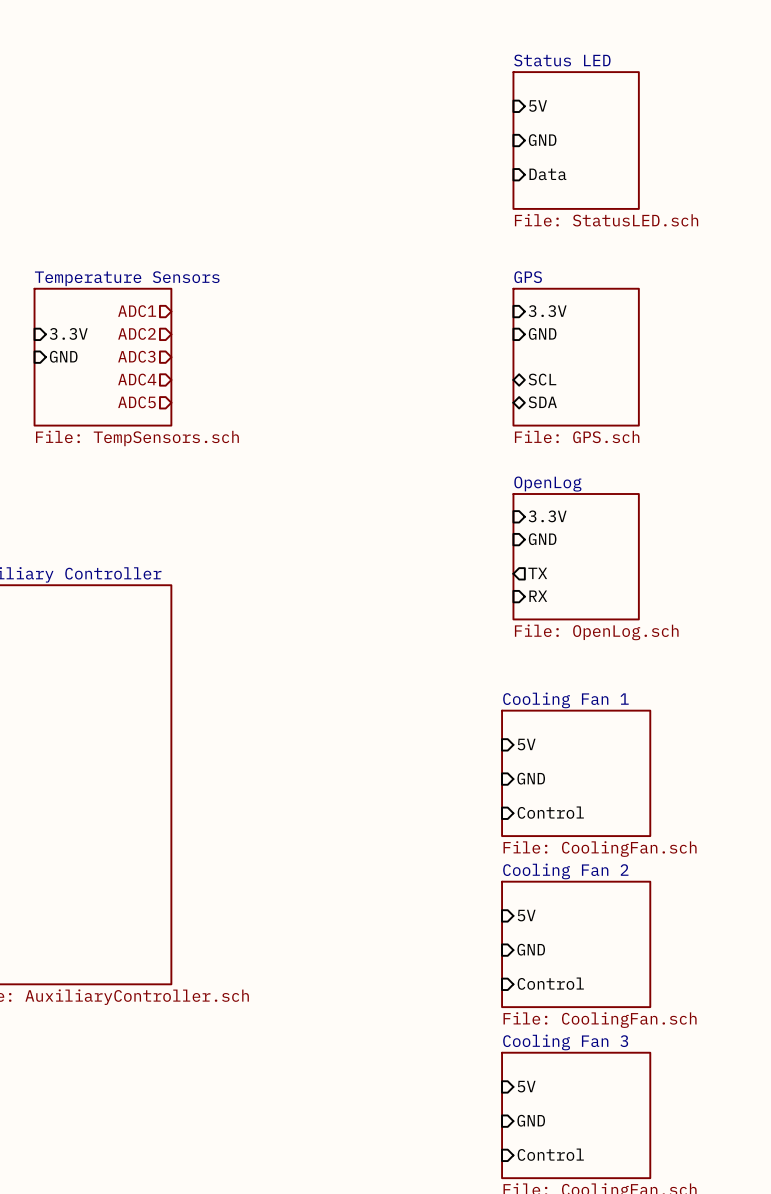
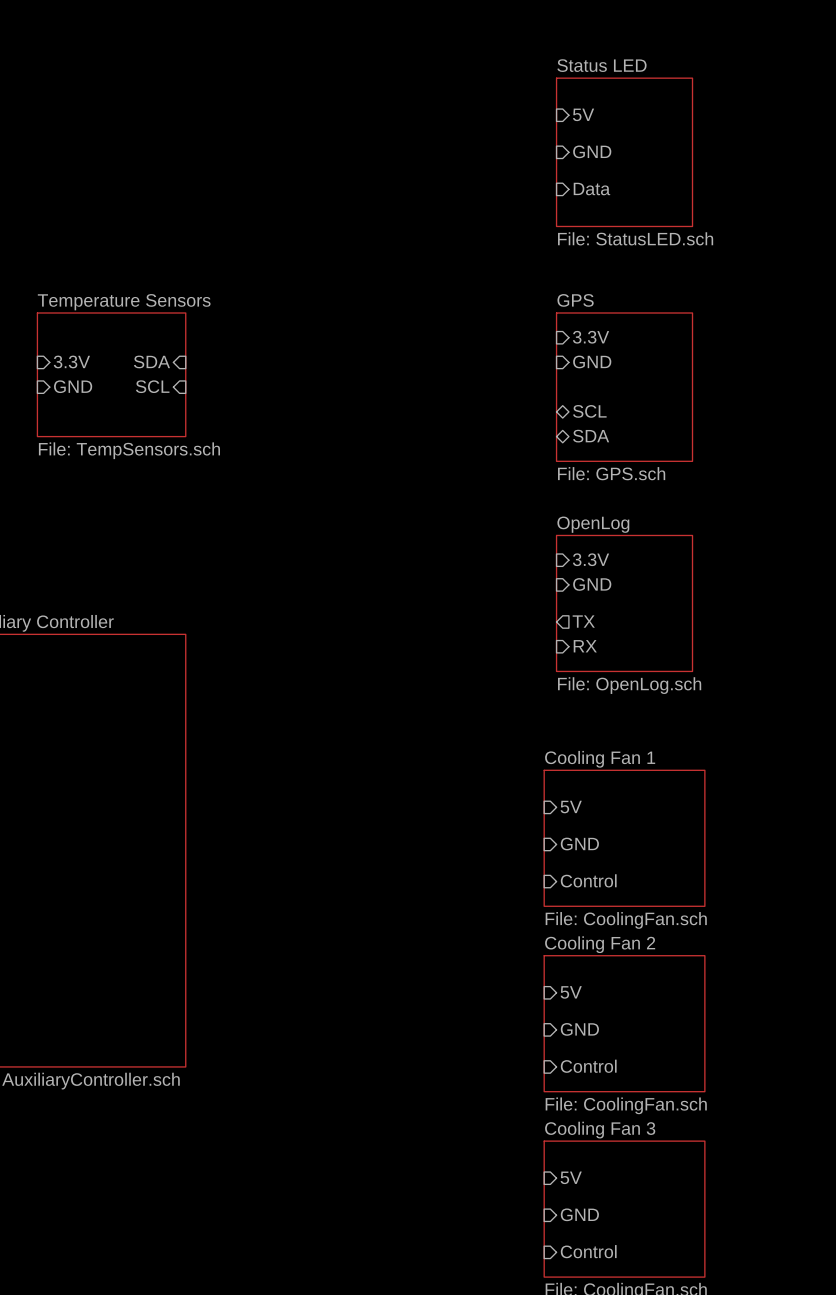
hierarchical label: ADC1 (137, 311) -> none
hierarchical label: ADC2 (137, 333) -> none
sheet pin: none -> SDA (151, 361)
sheet Temperature Sensors: none -> File: TempSensors.sch (111, 374)
hierarchical label: ADC3 (136, 356) -> none
sheet pin: none -> SCL (152, 386)
sheet Temperature Sensors: File: TempSensors.sch (102, 357) -> none
hierarchical label: ADC4 (137, 379) -> none
hierarchical label: ADC5 (136, 402) -> none

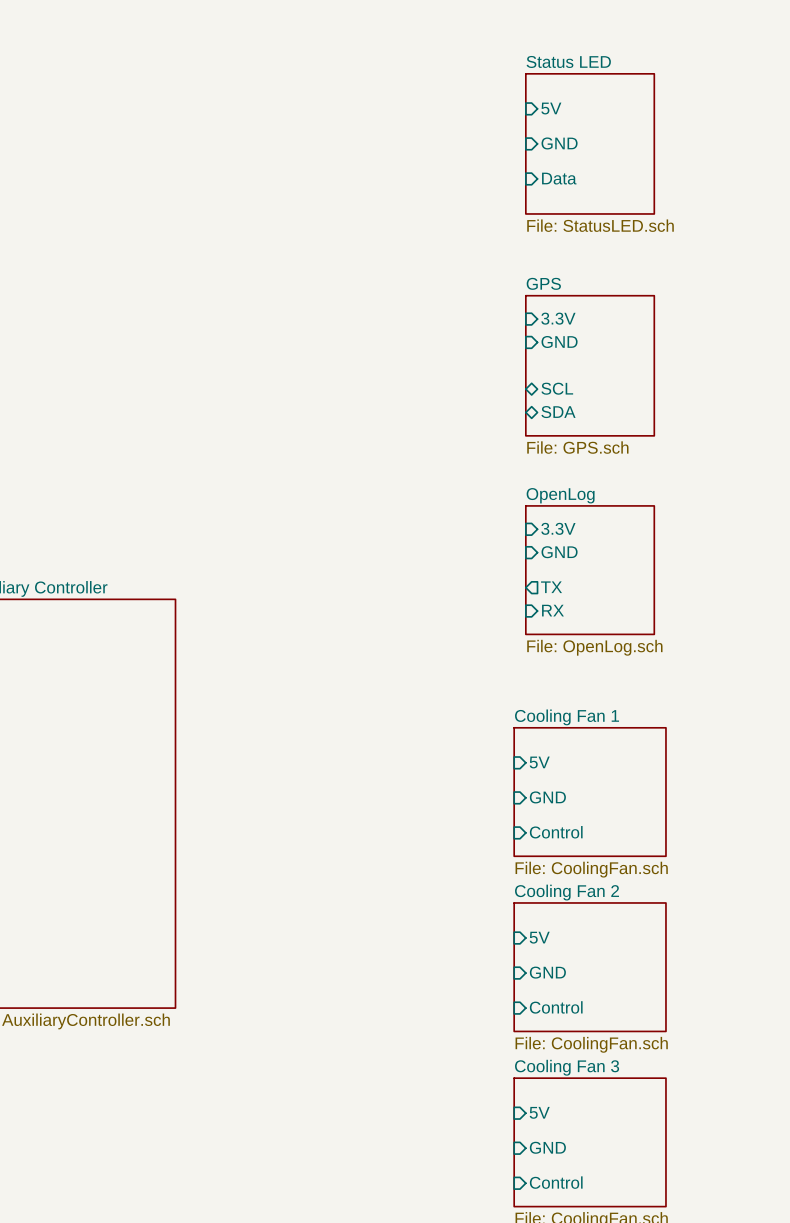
sheet pin: 3.3V (71, 361) -> none
sheet pin: SDA (151, 361) -> none
sheet Temperature Sensors: File: TempSensors.sch (111, 374) -> none
sheet pin: GND (73, 386) -> none
sheet pin: SCL (152, 386) -> none

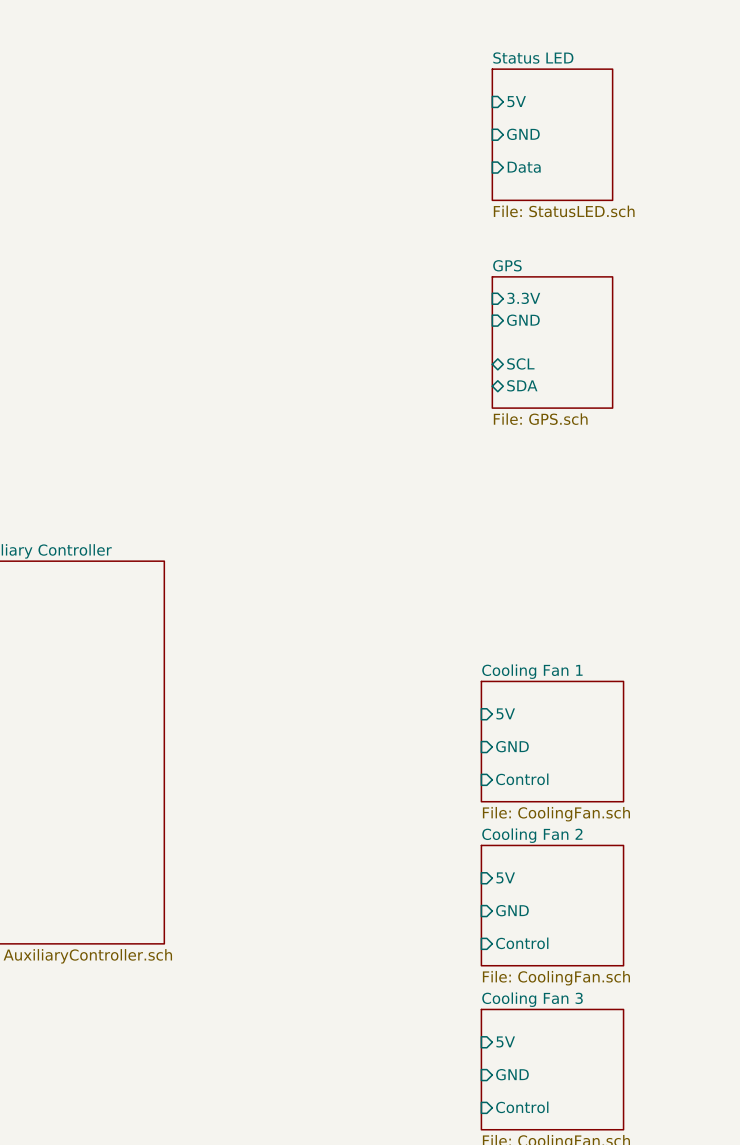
sheet pin: 3.3V (558, 528) -> none
sheet pin: GND (559, 552) -> none
sheet OpenLog: File: OpenLog.sch (590, 570) -> none
sheet pin: TX (551, 587) -> none
sheet pin: RX (552, 610) -> none

